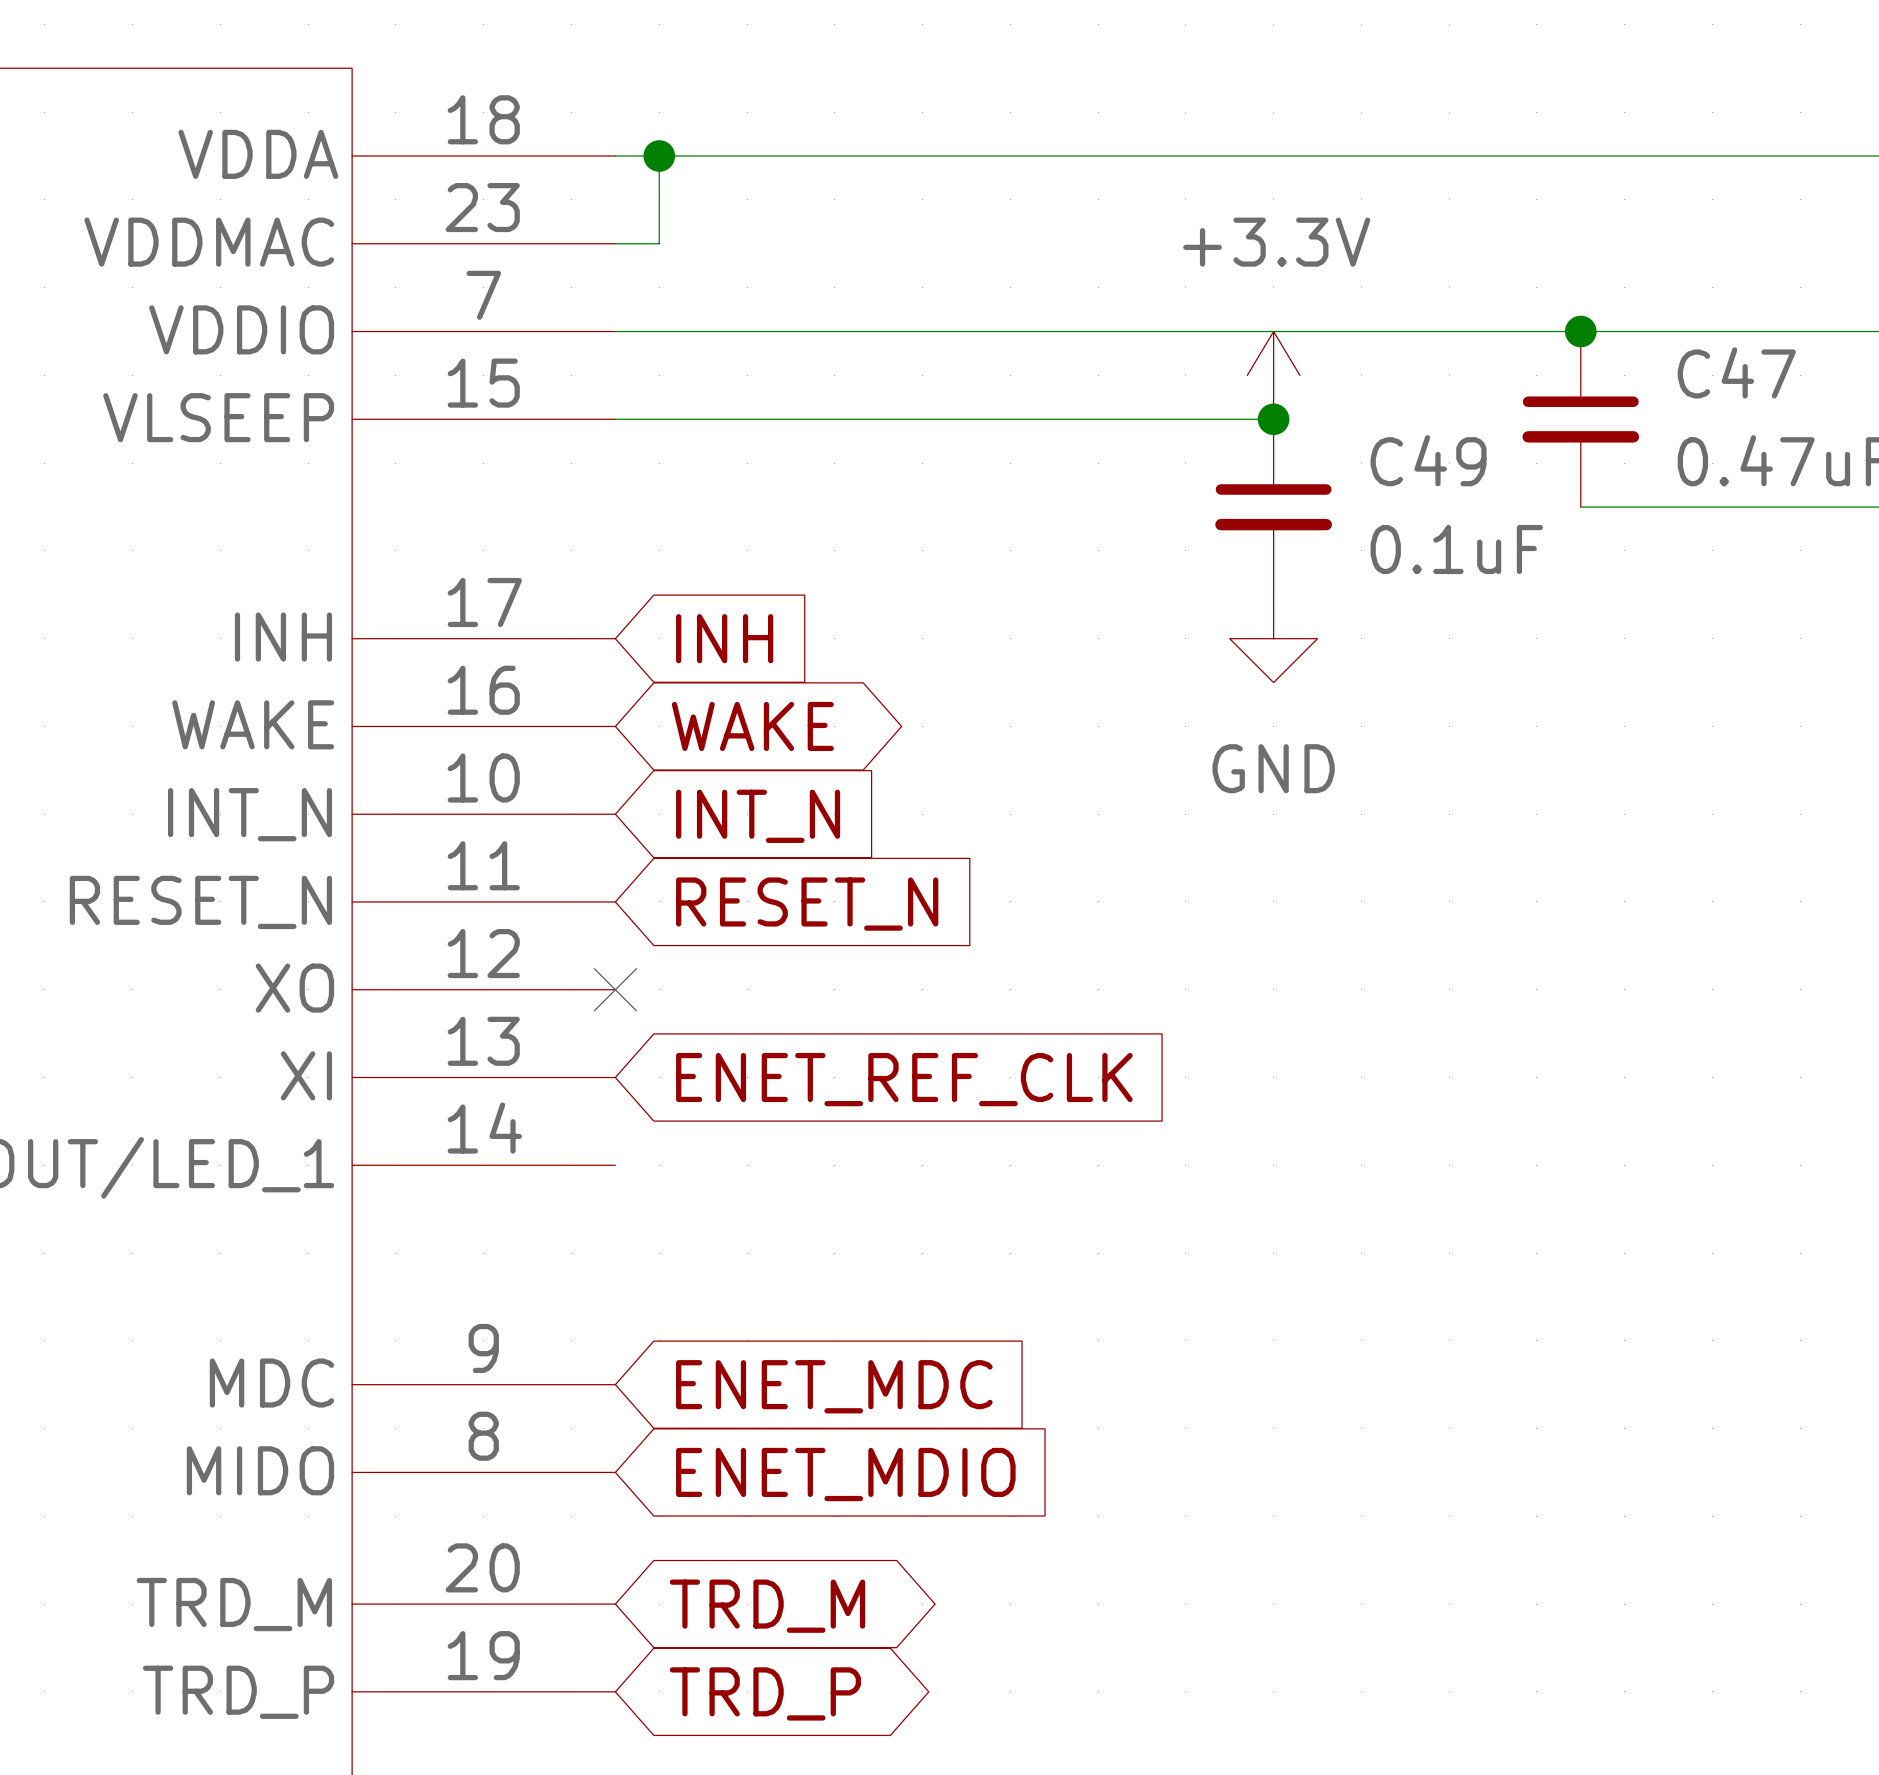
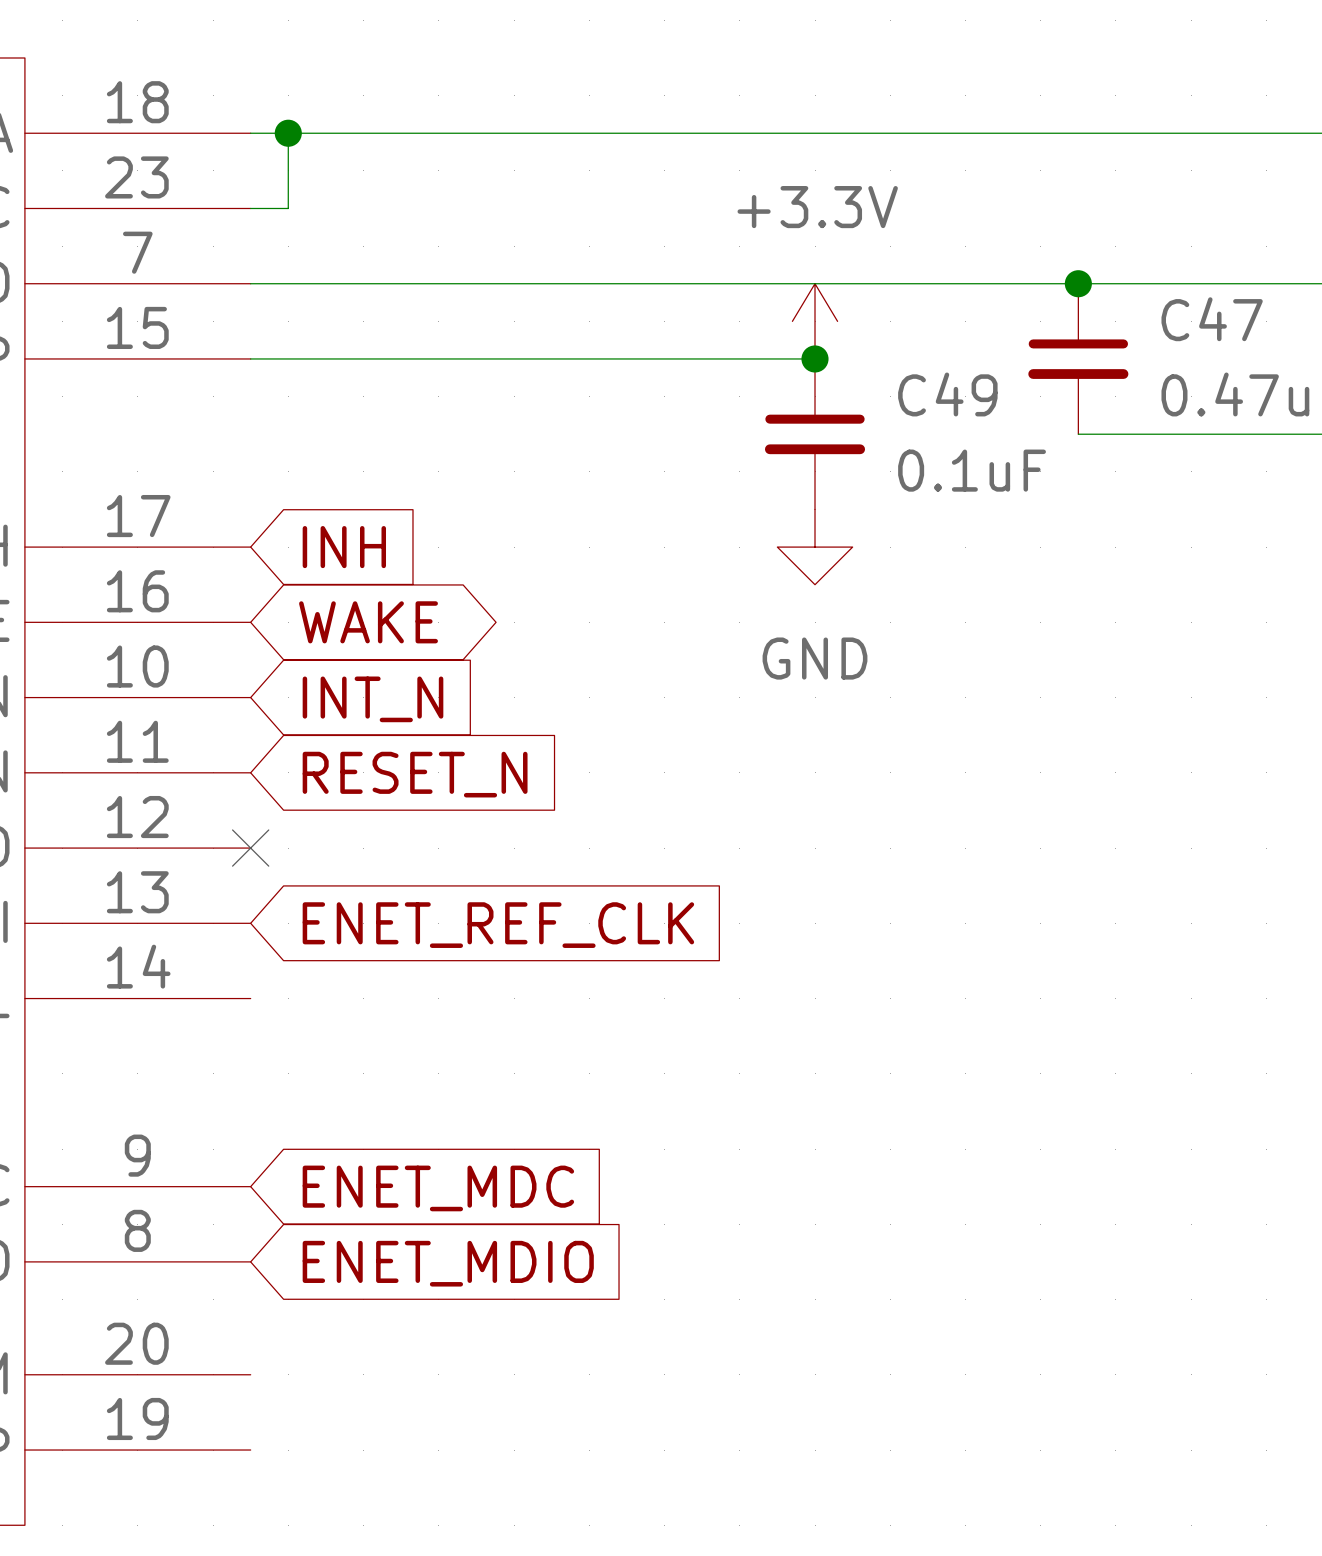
global label: TRD_M (767, 1606) -> none
global label: TRD_P (765, 1693) -> none

